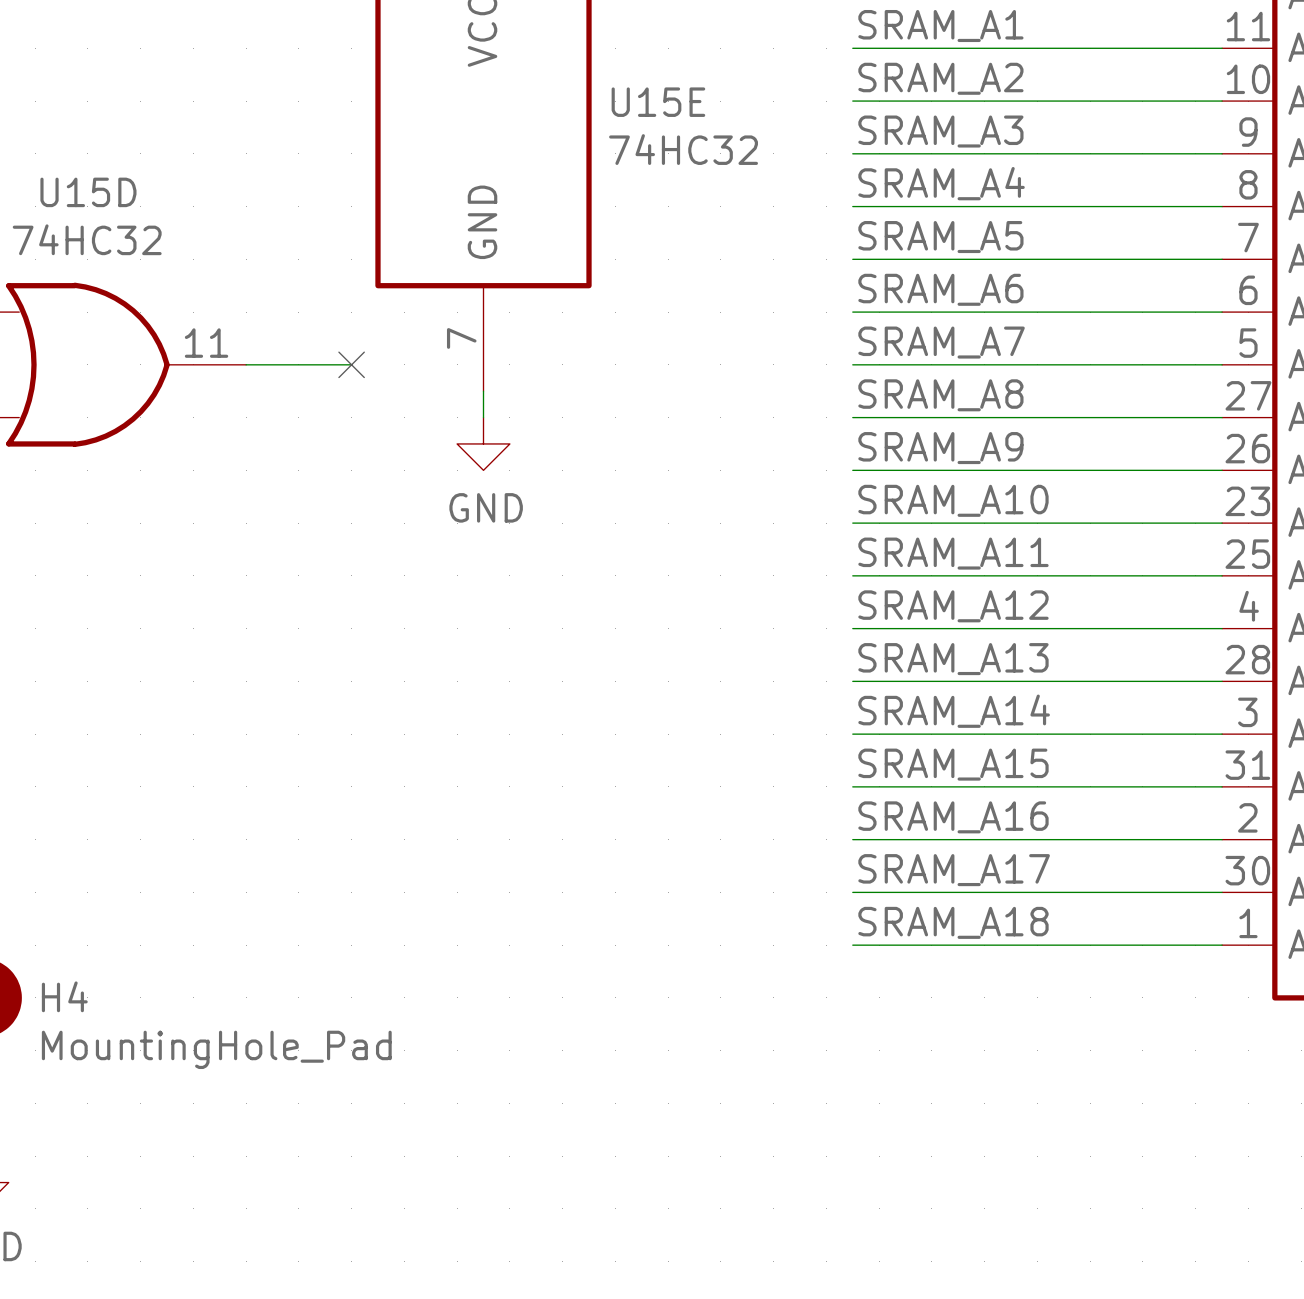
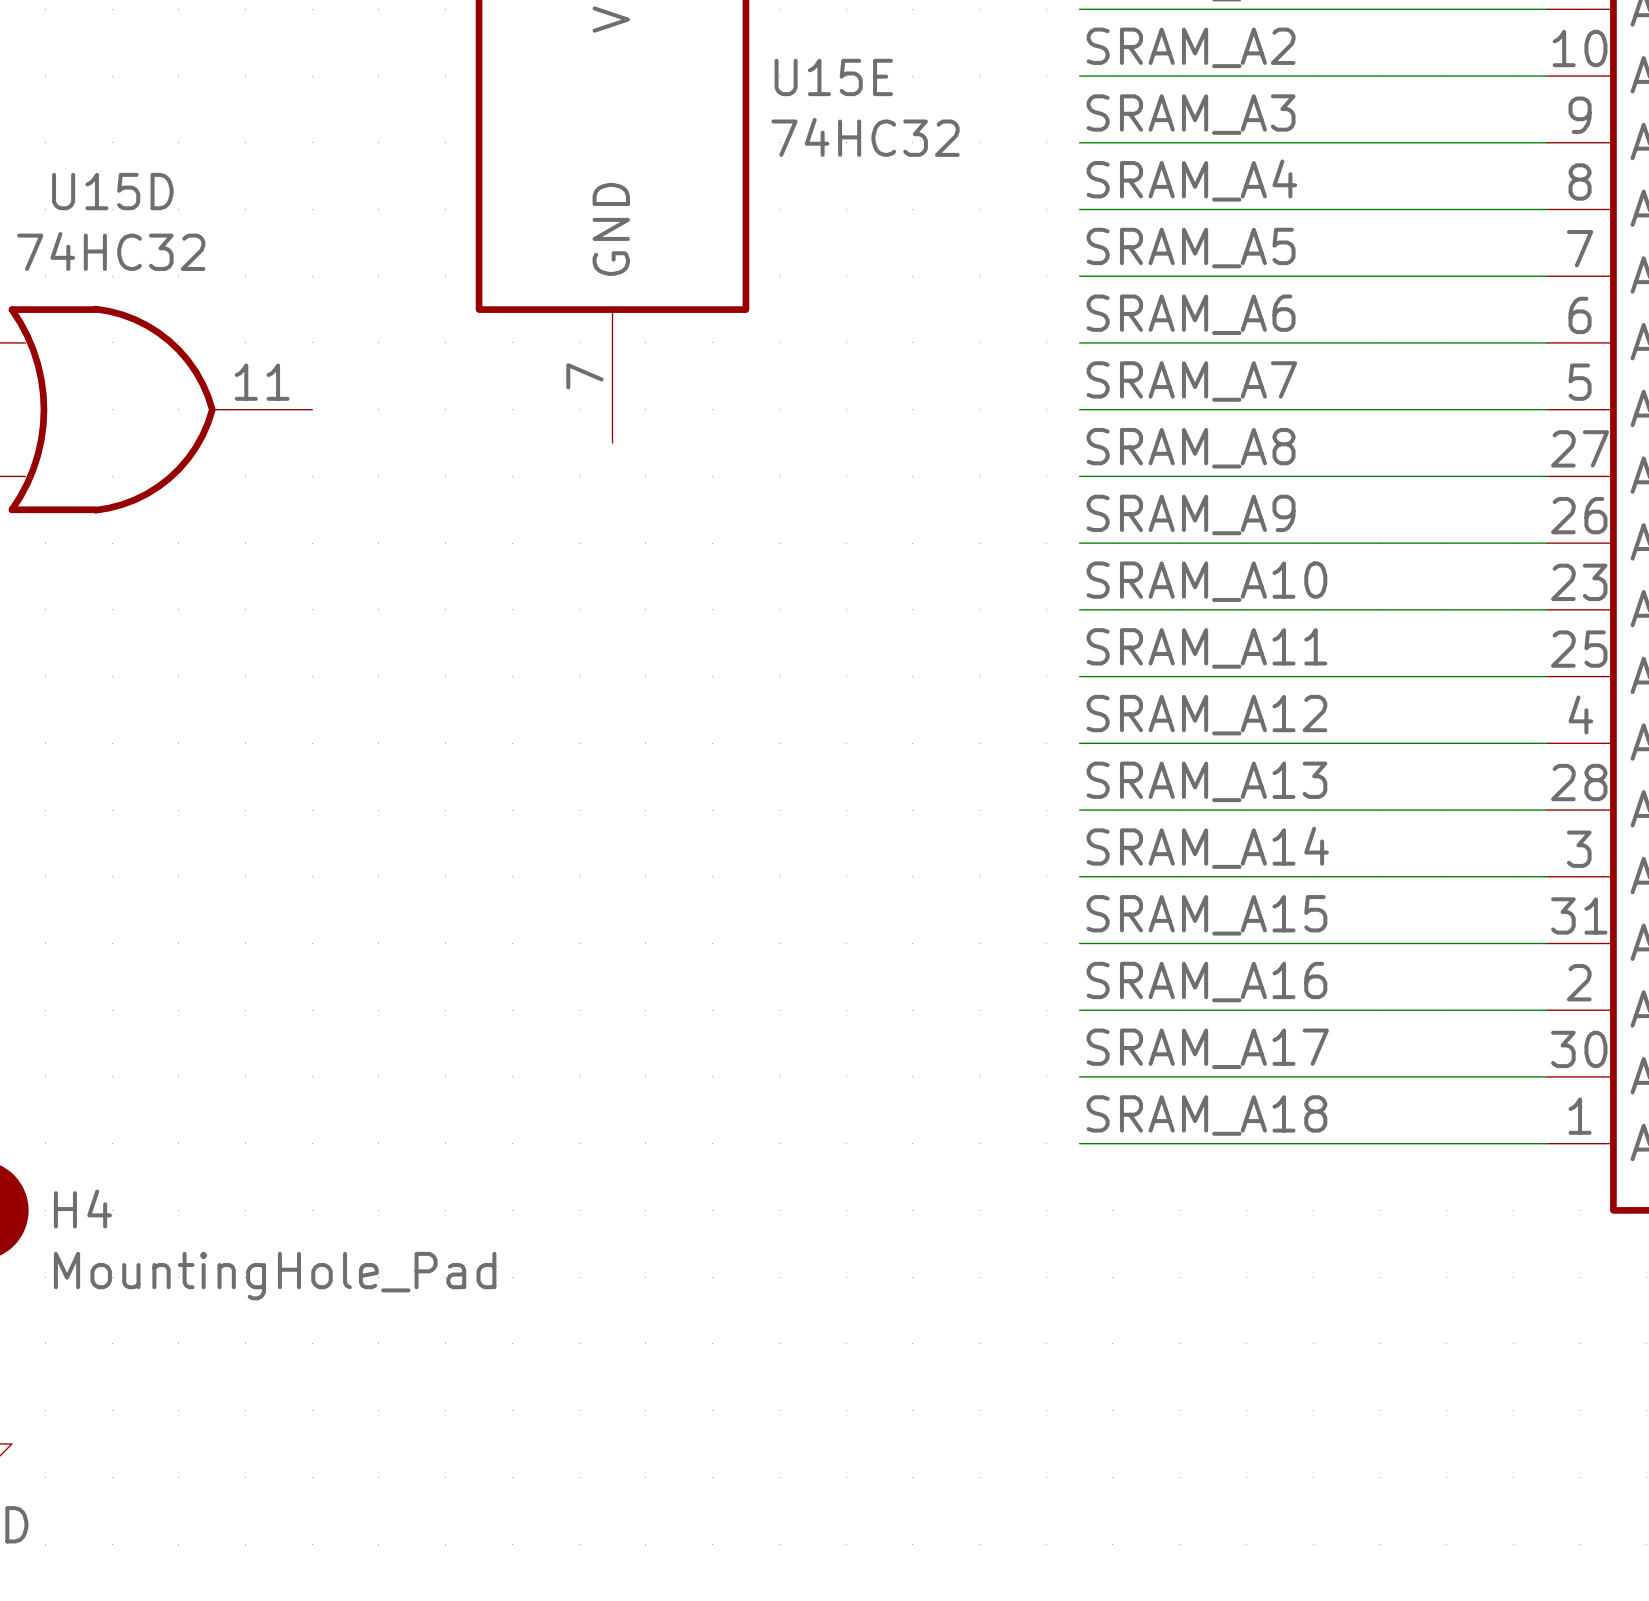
wire: (246, 364) (351, 364) -> none
no-connect mark: (351, 364) -> none
wire: (483, 391) (483, 417) -> none
power symbol: GND (483, 443) -> none

